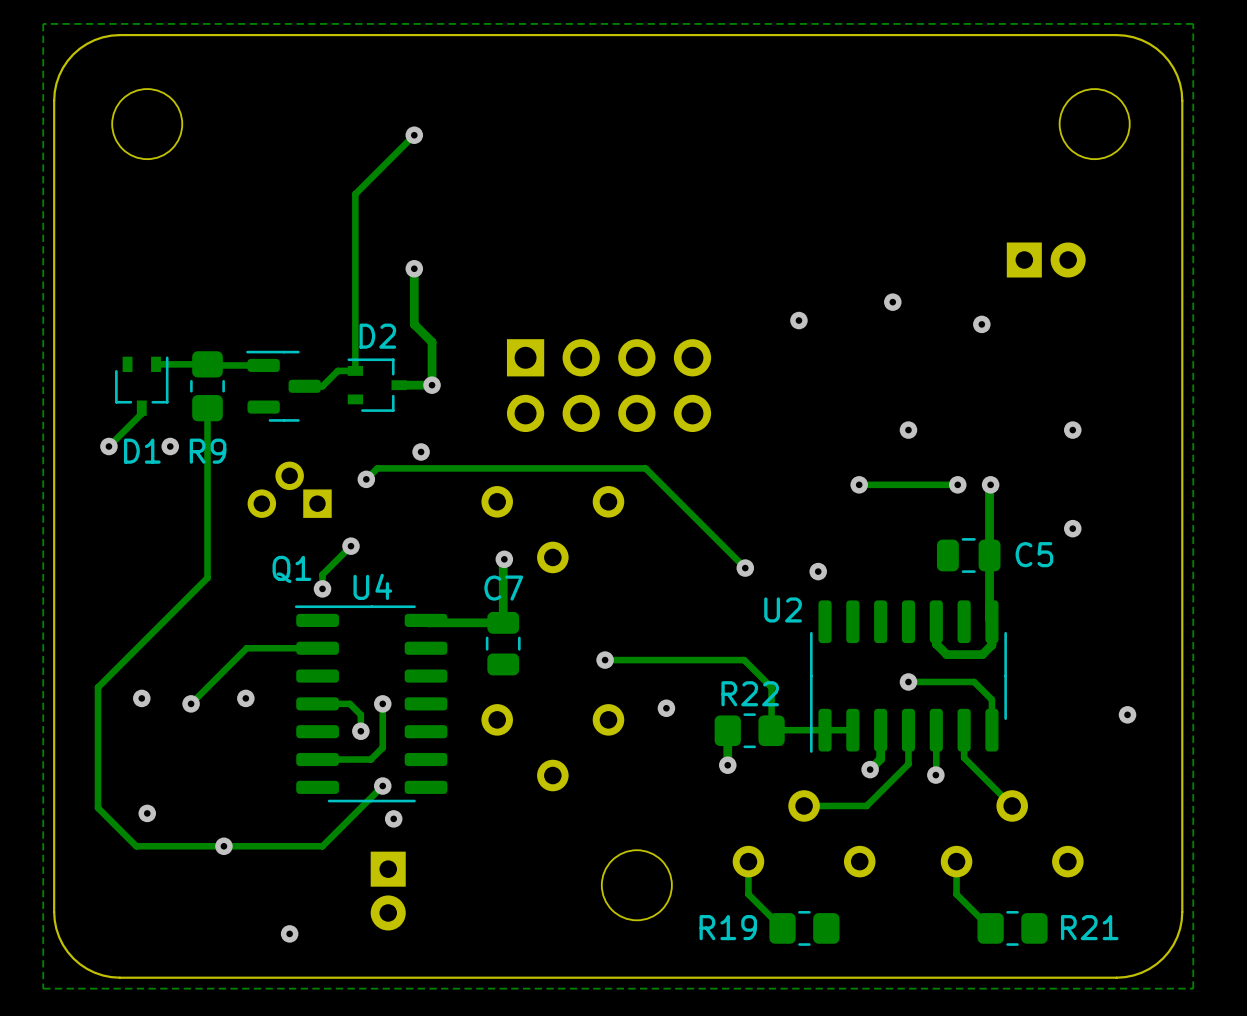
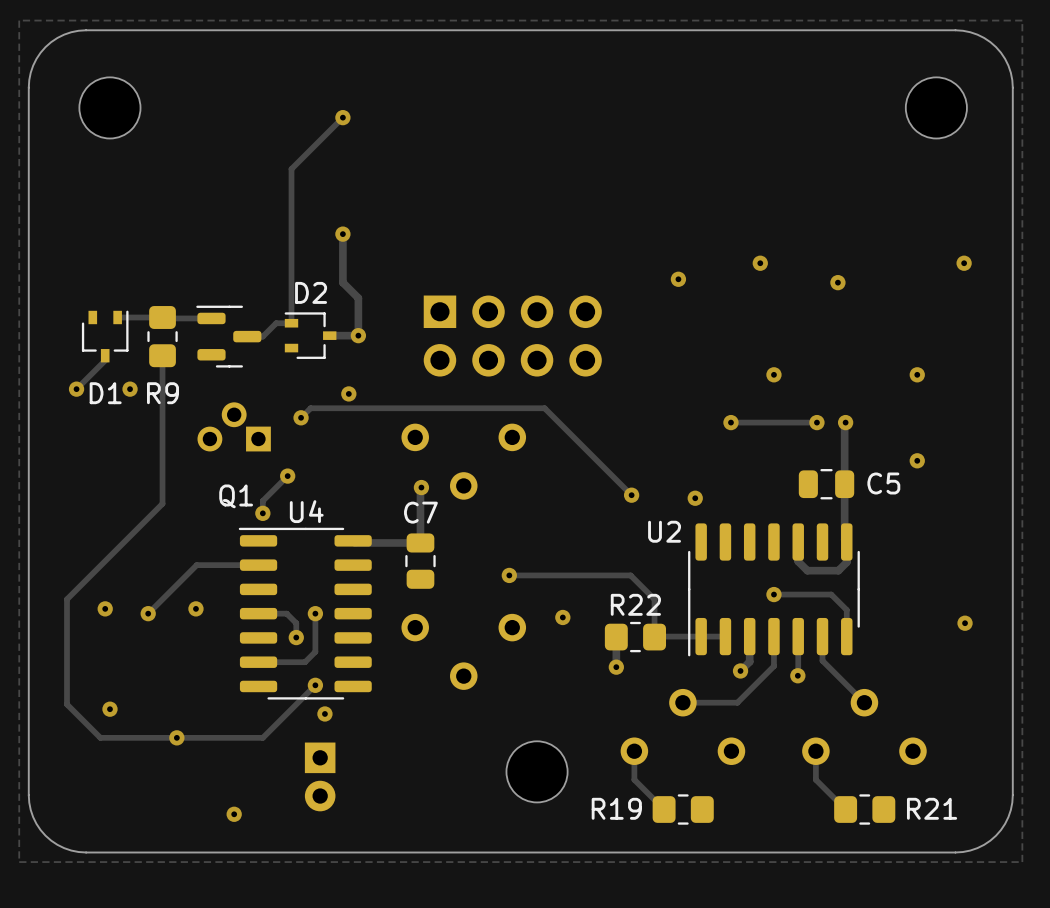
part: (1046, 260) -> none
via: none -> (964, 263)

